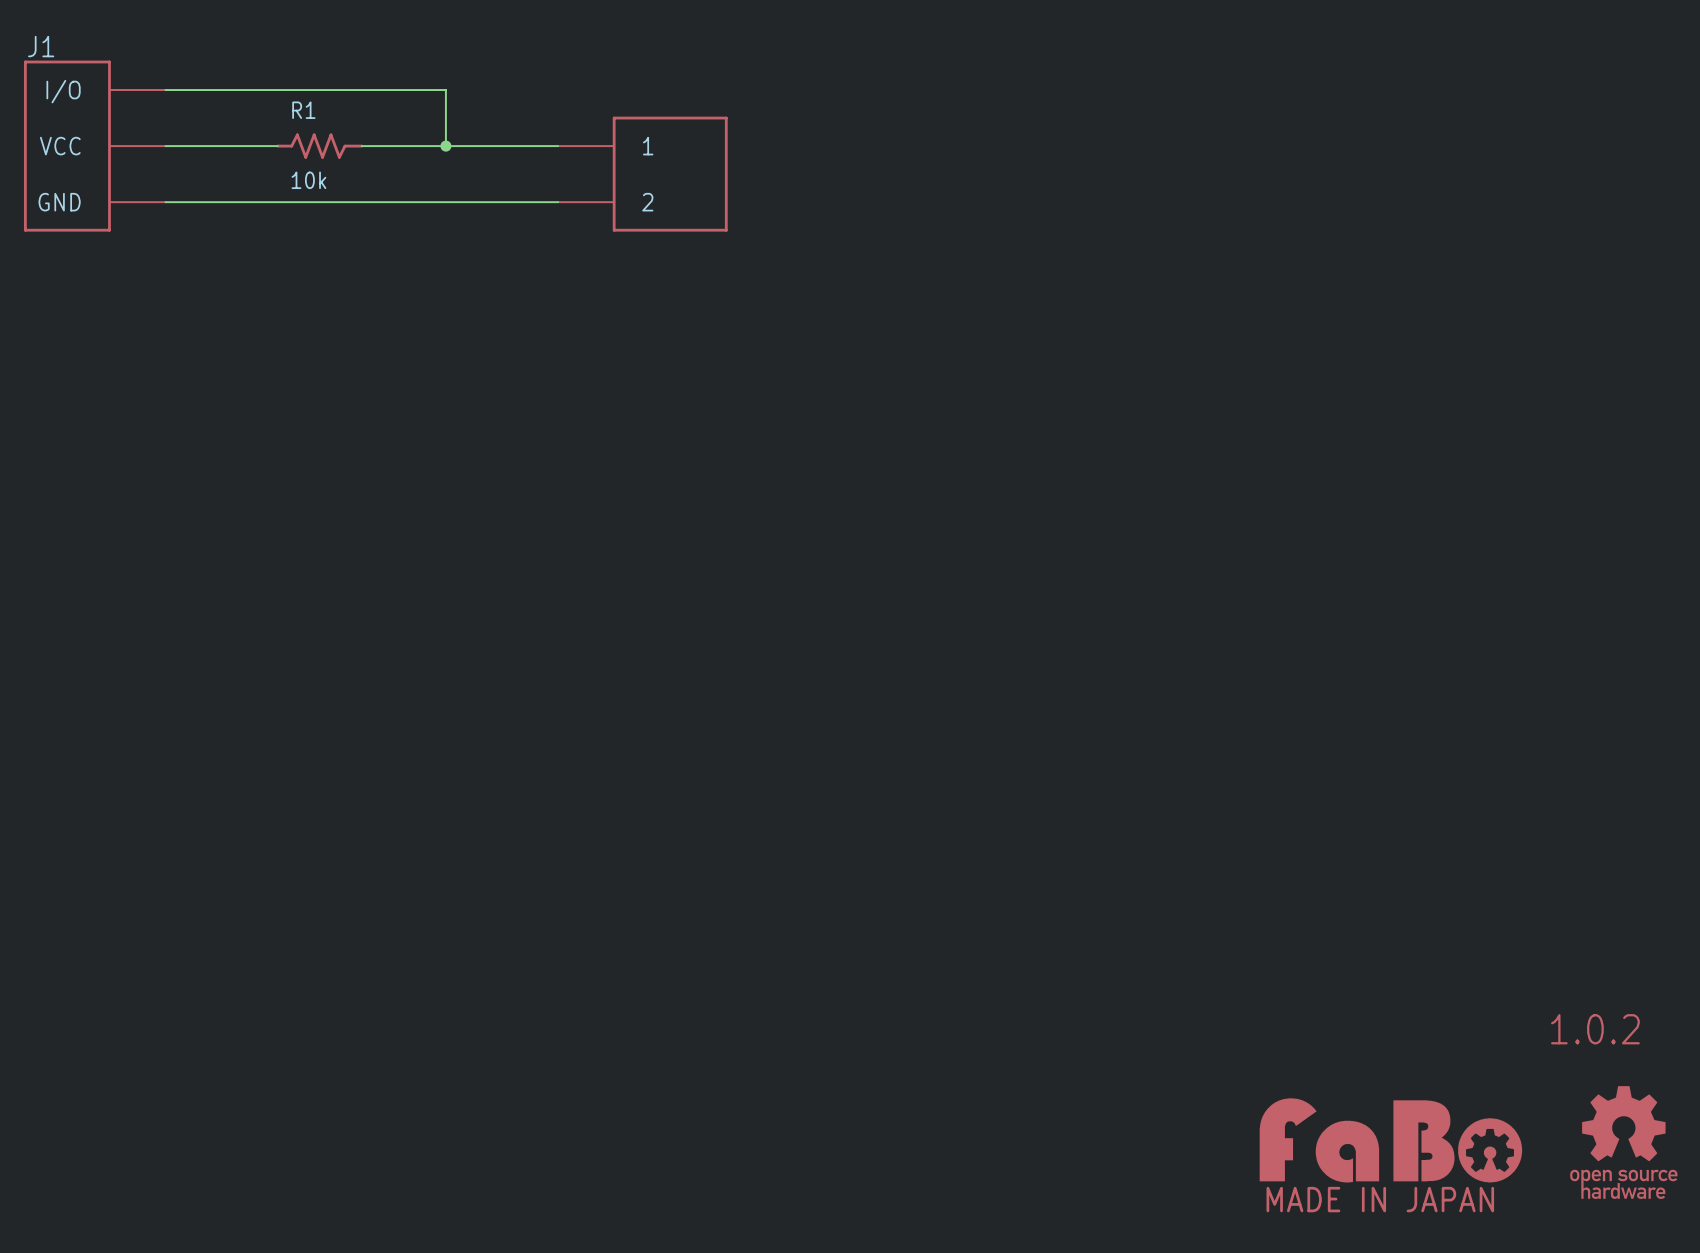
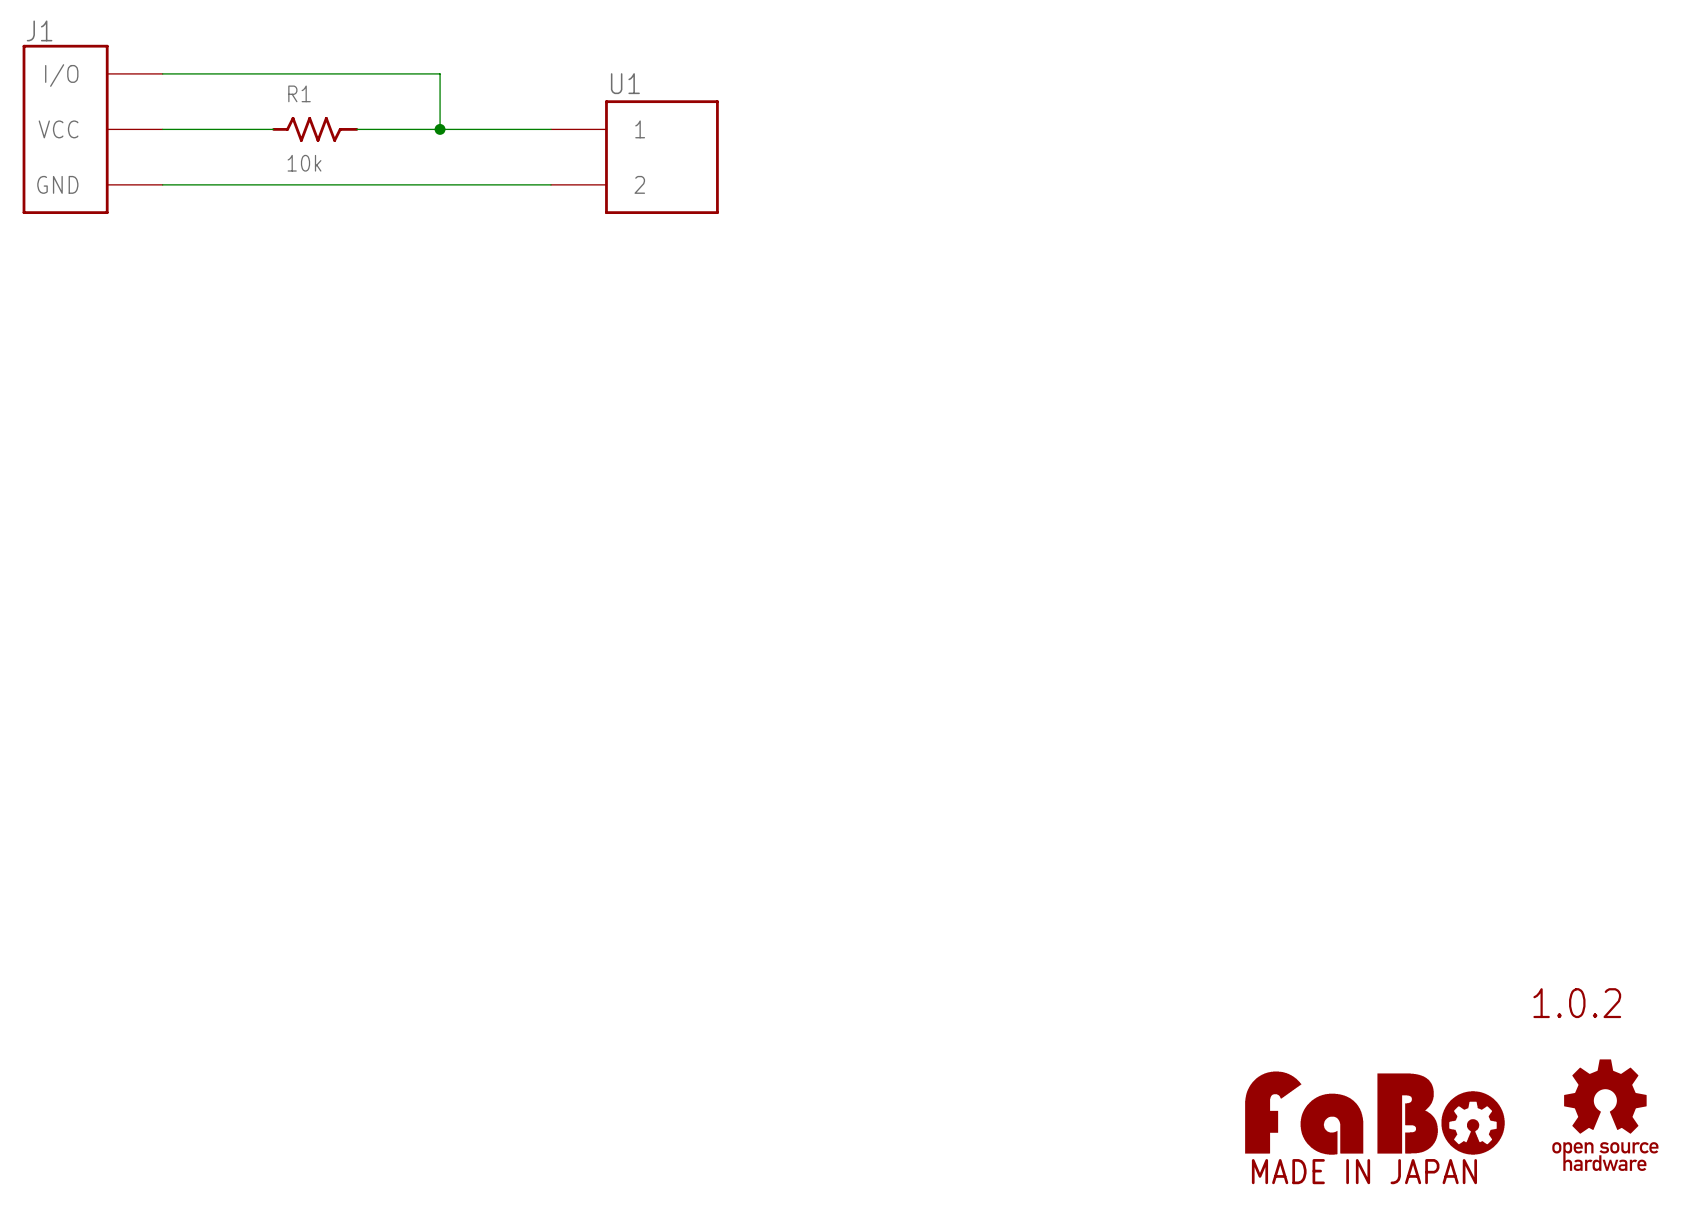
U1 name: none -> U1 (625, 83)

